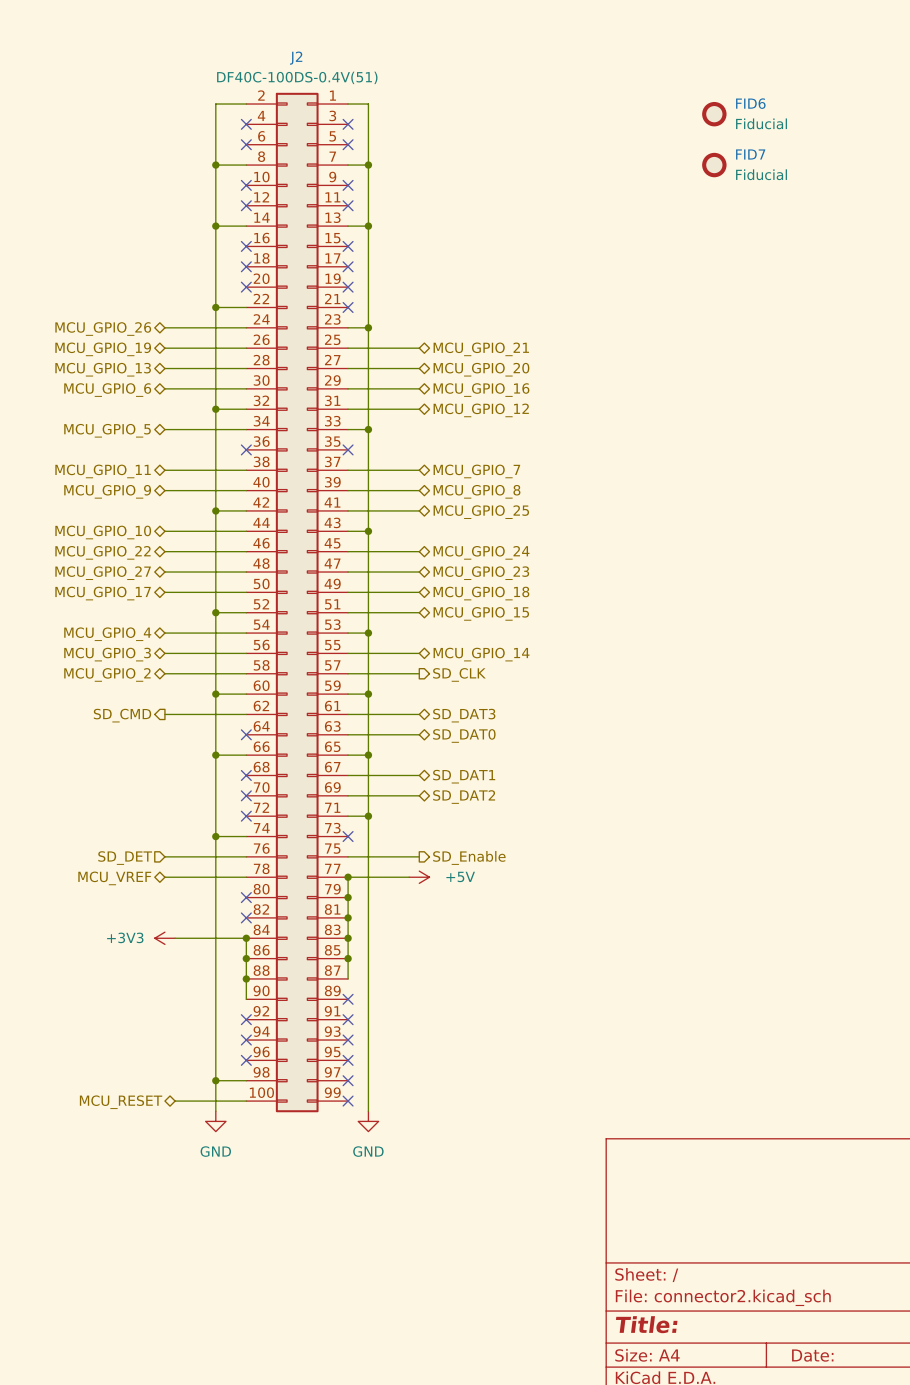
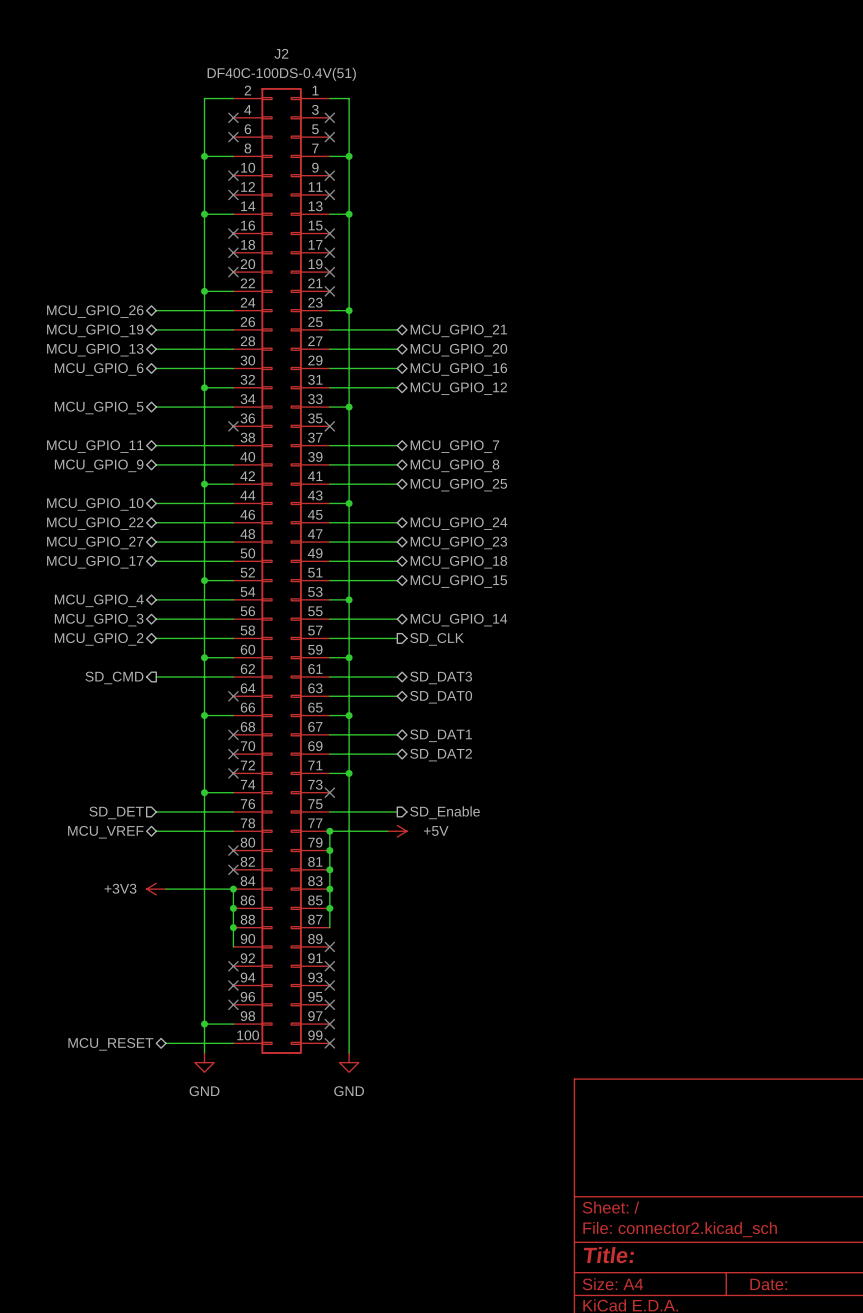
FID6: Fiducial (714, 114) -> none
FID7: Fiducial (714, 165) -> none

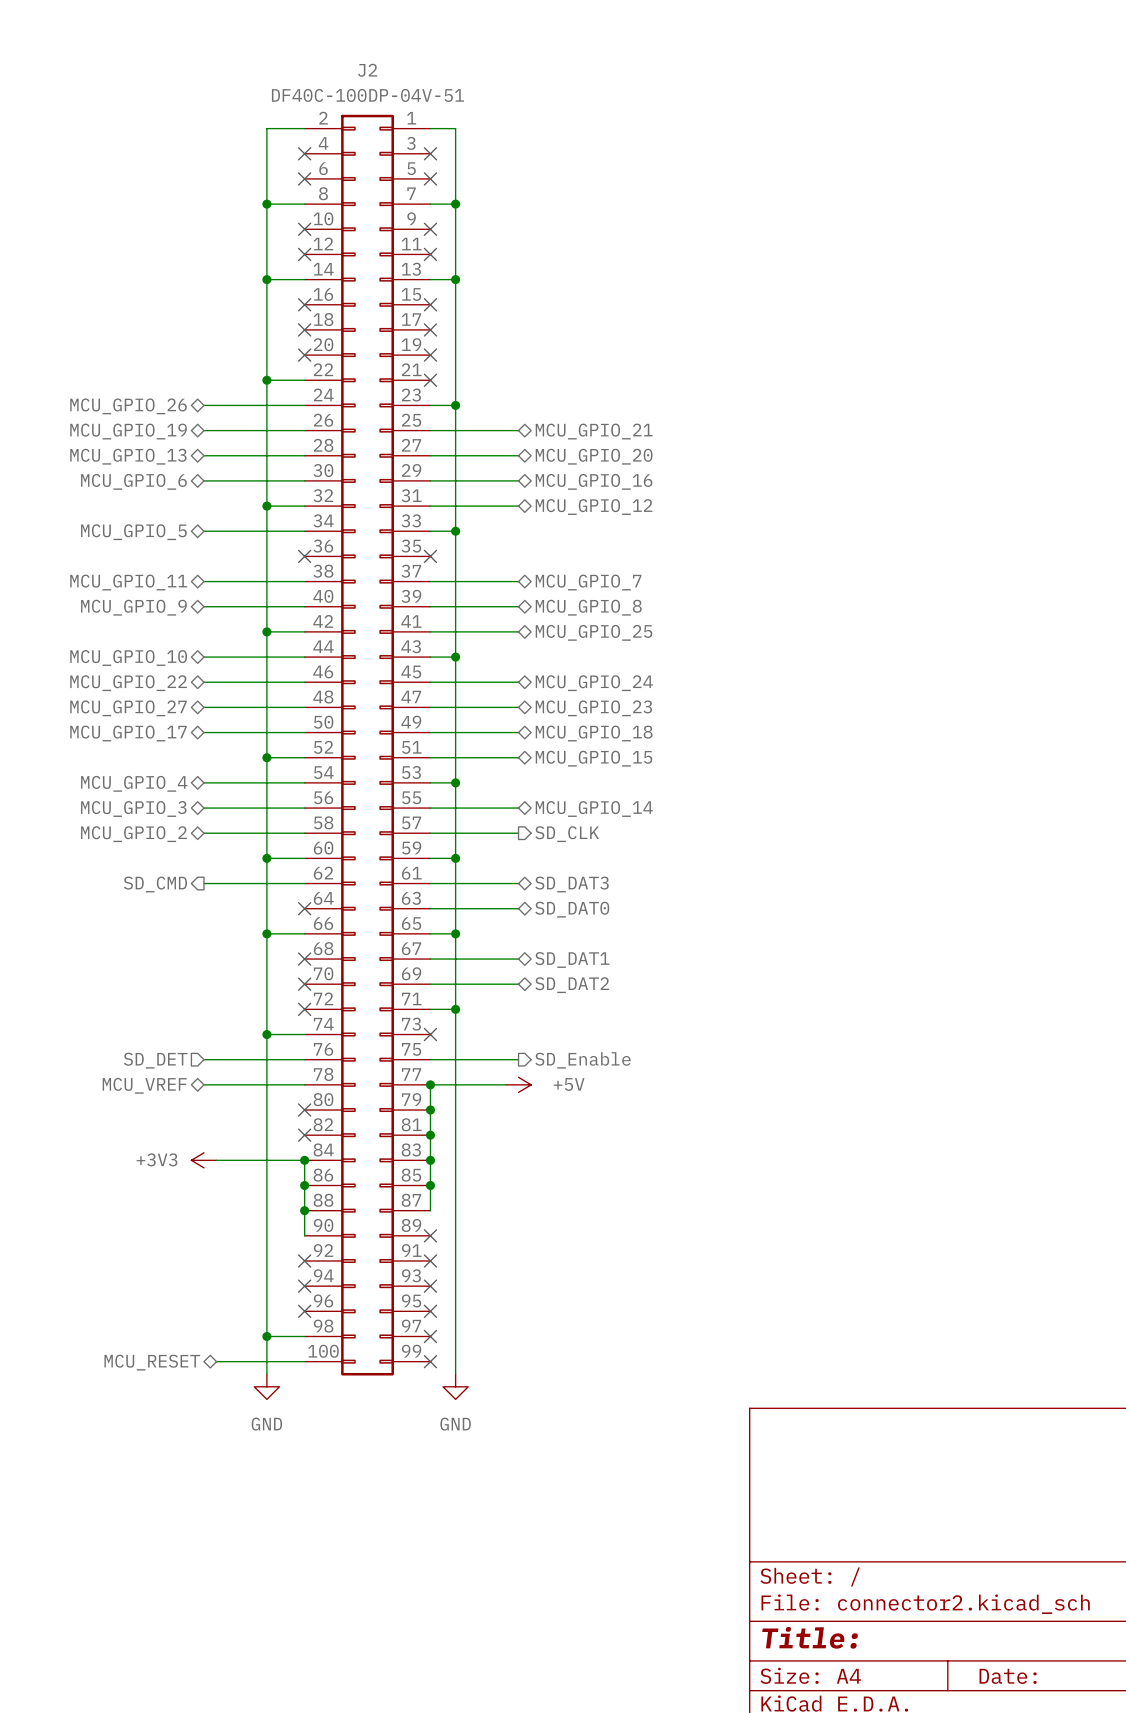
J2 value: DF40C-100DS-0.4V(51) (281, 74) -> DF40C-100DP-04V-51 (367, 95)

